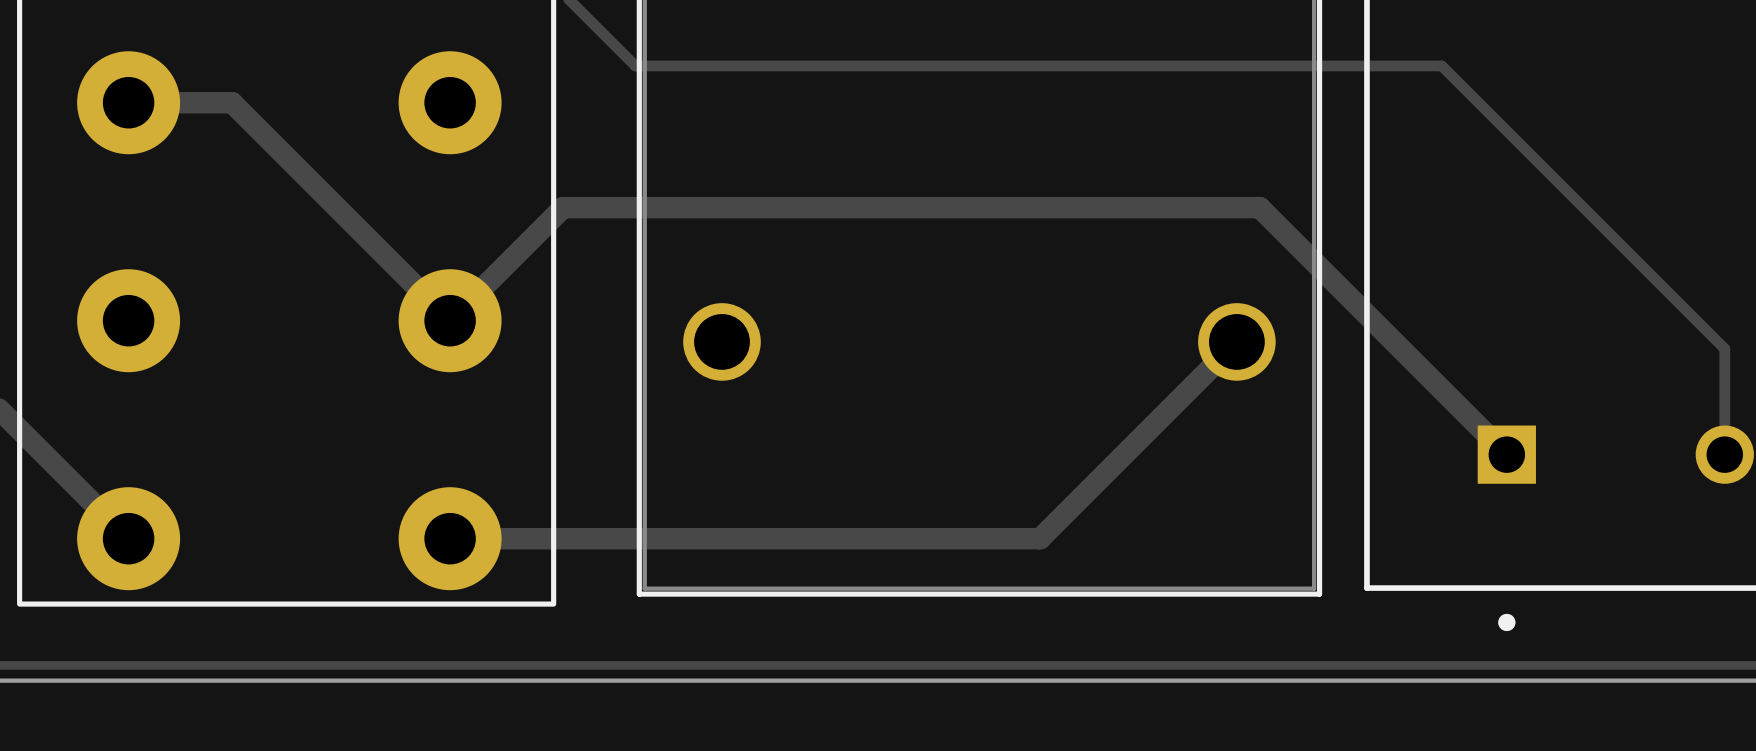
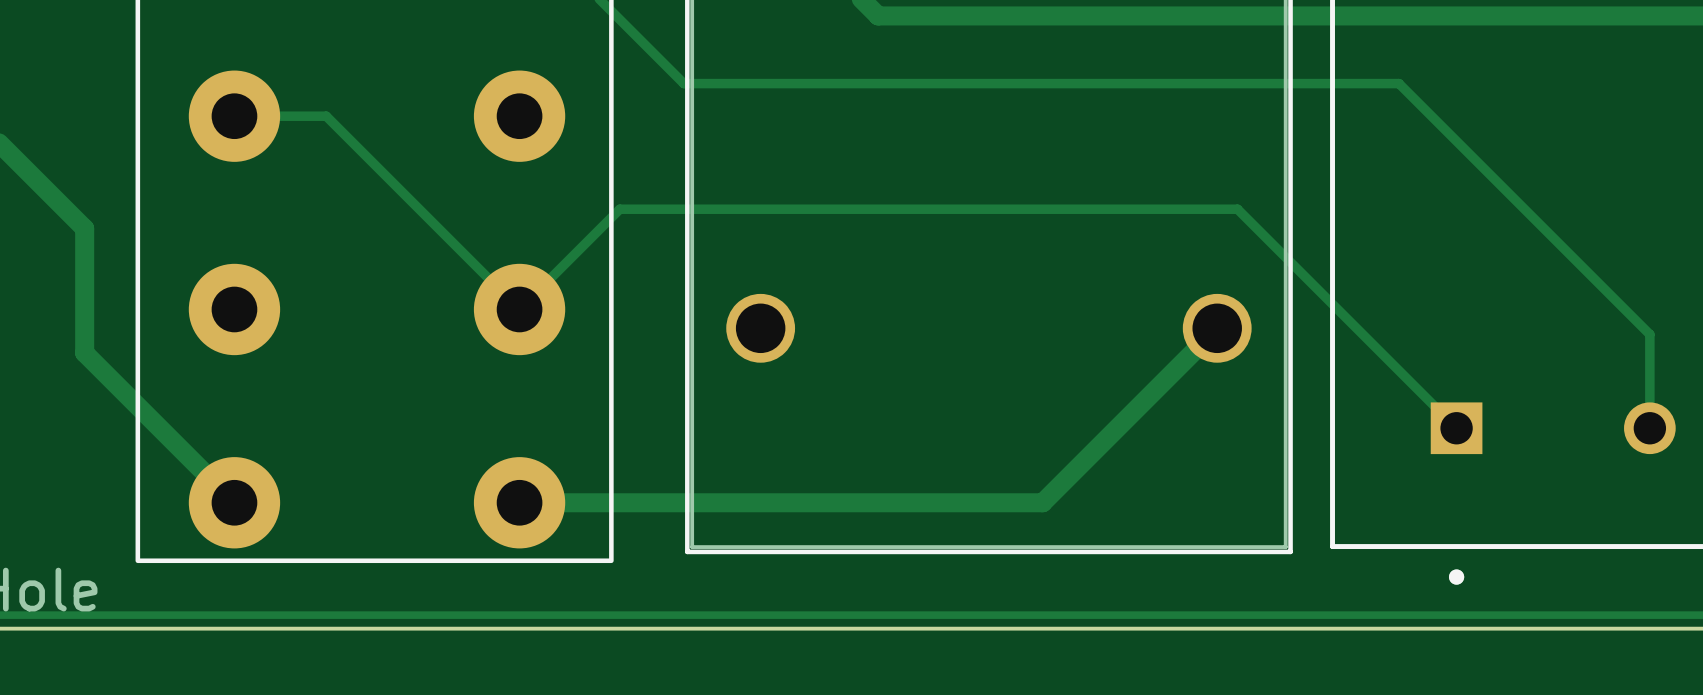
track width: thick (128, 102) (232, 102) (450, 320) (563, 207) (1259, 207) (1506, 454) -> thin (234, 116) (326, 116) (519, 309) (619, 209) (1237, 209) (1456, 428)

